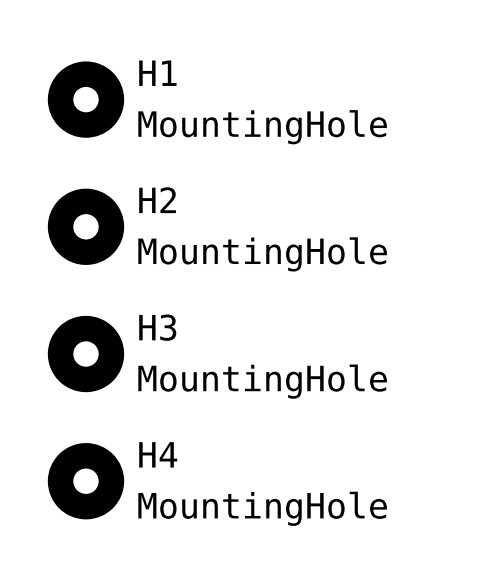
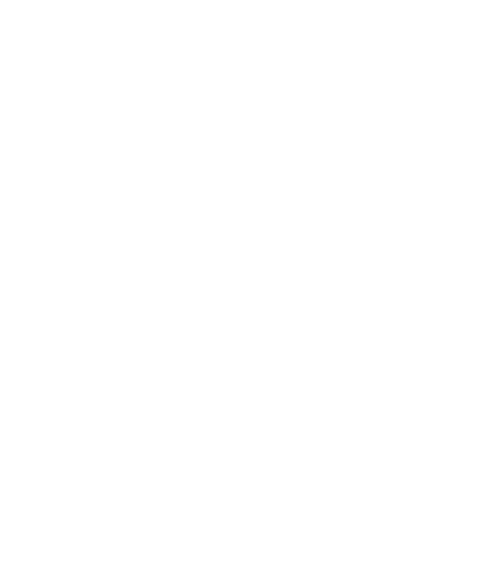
H1: MountingHole (85, 99) -> none
H2: MountingHole (85, 226) -> none
H3: MountingHole (85, 354) -> none
H4: MountingHole (85, 481) -> none

